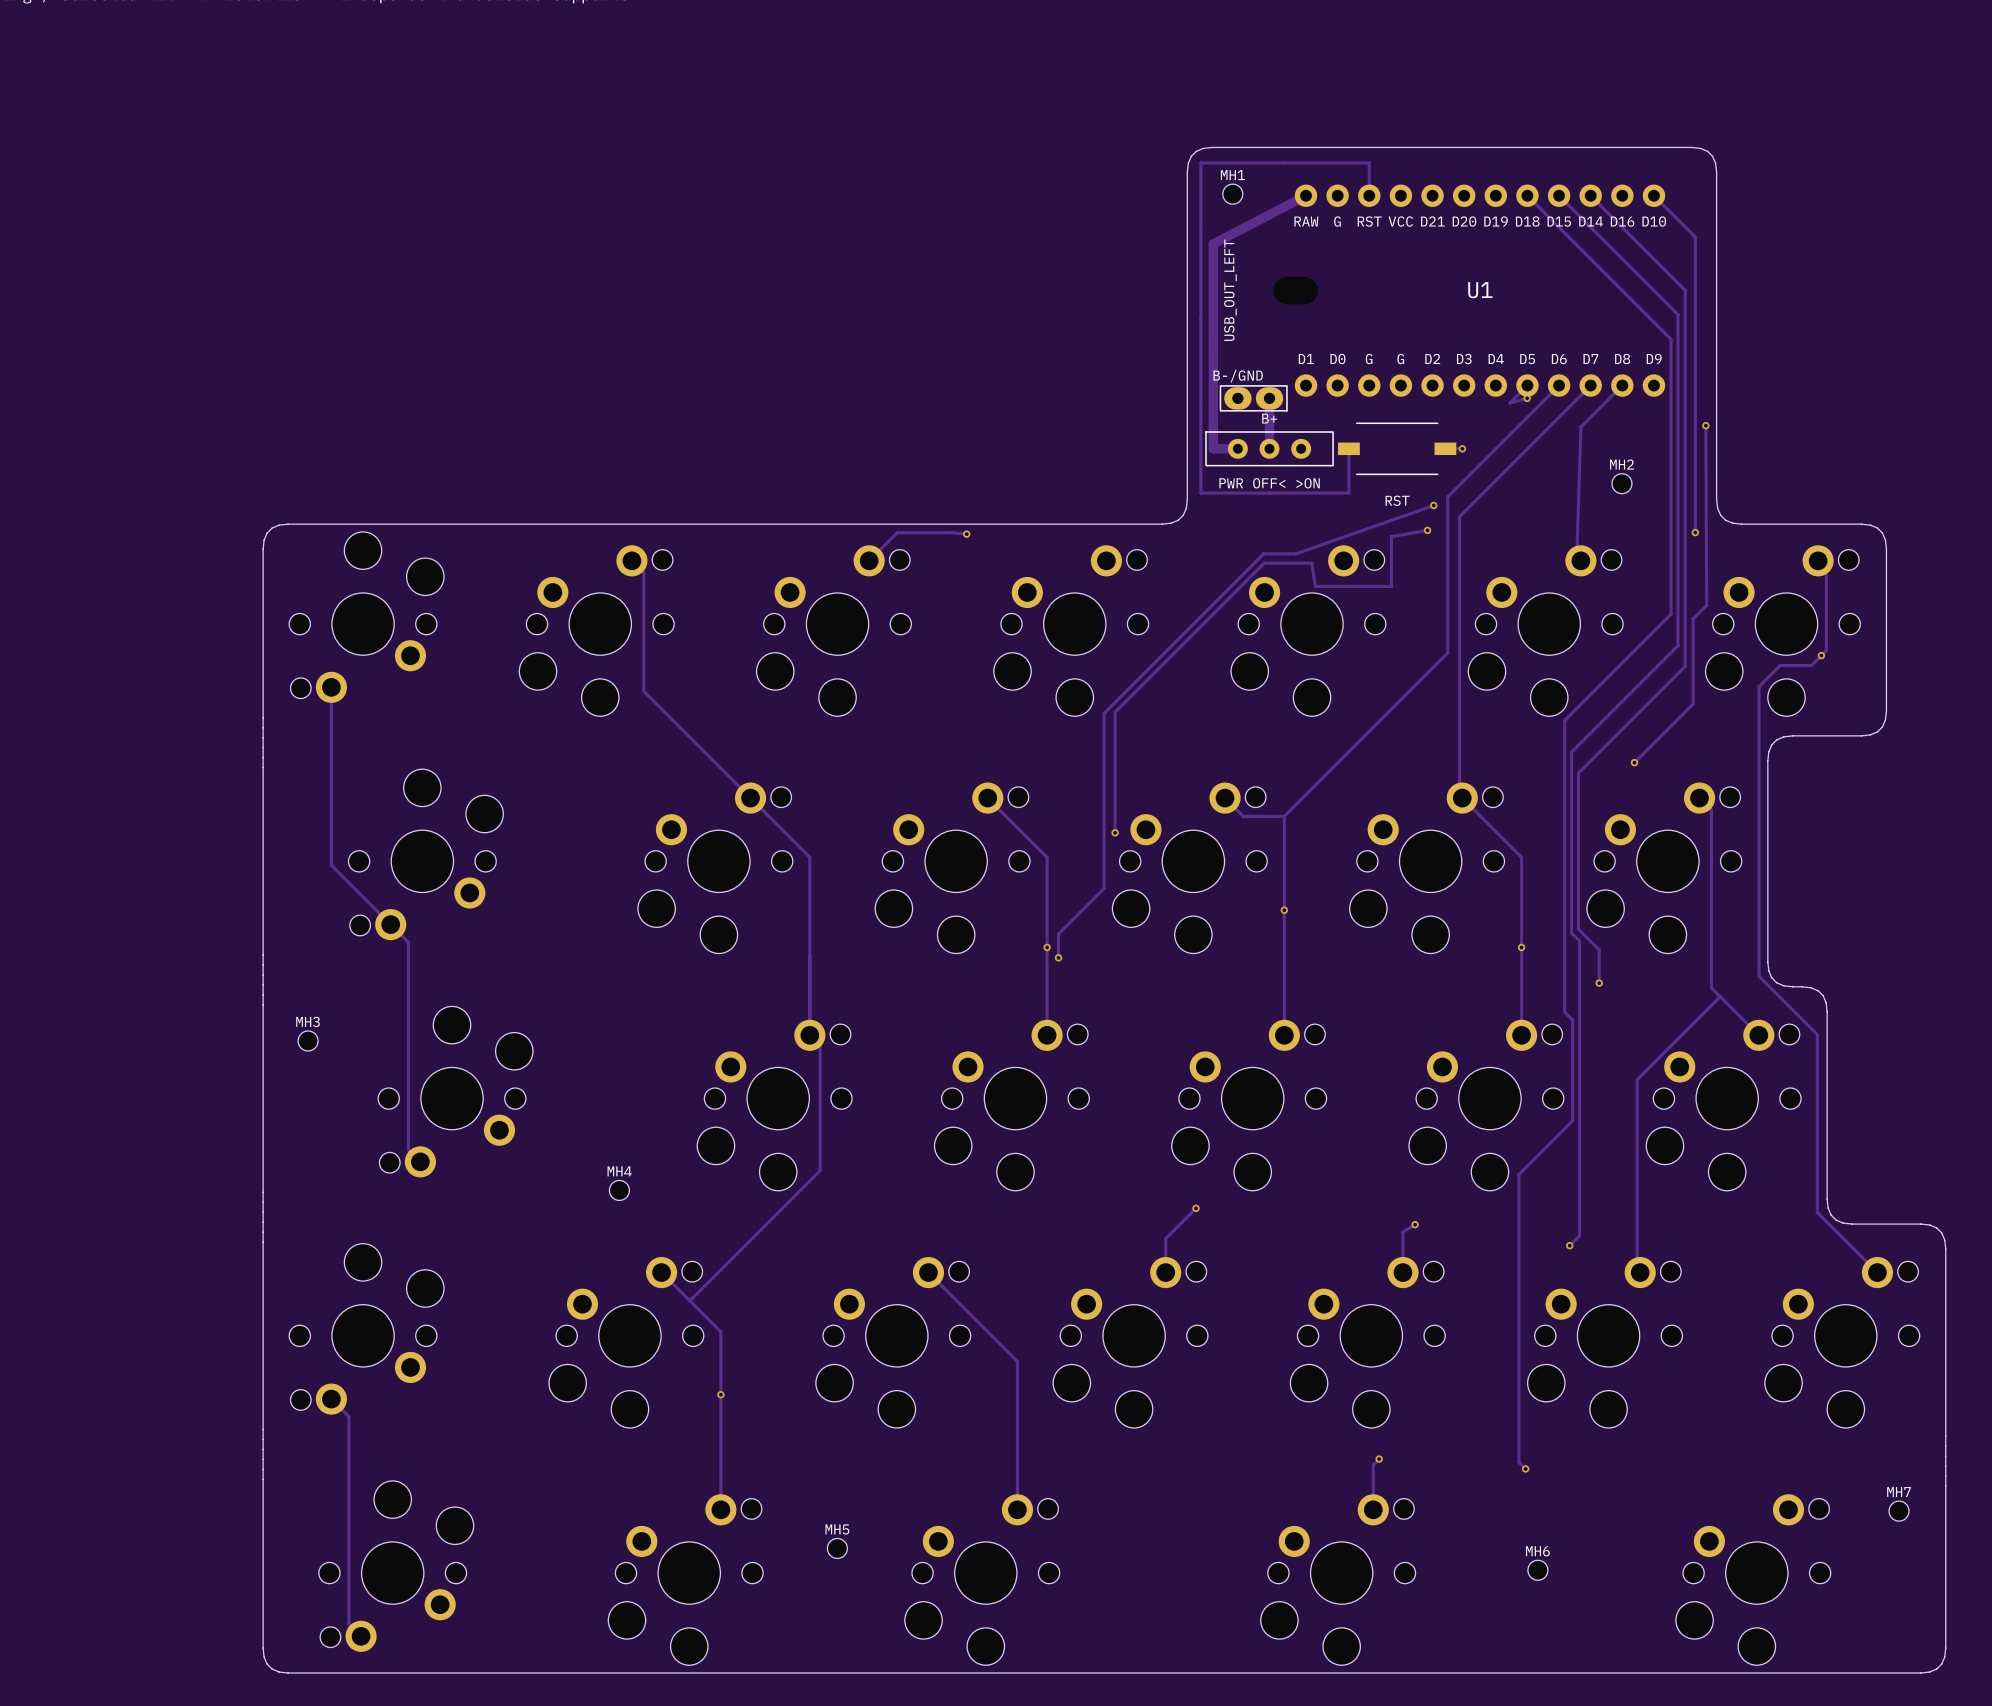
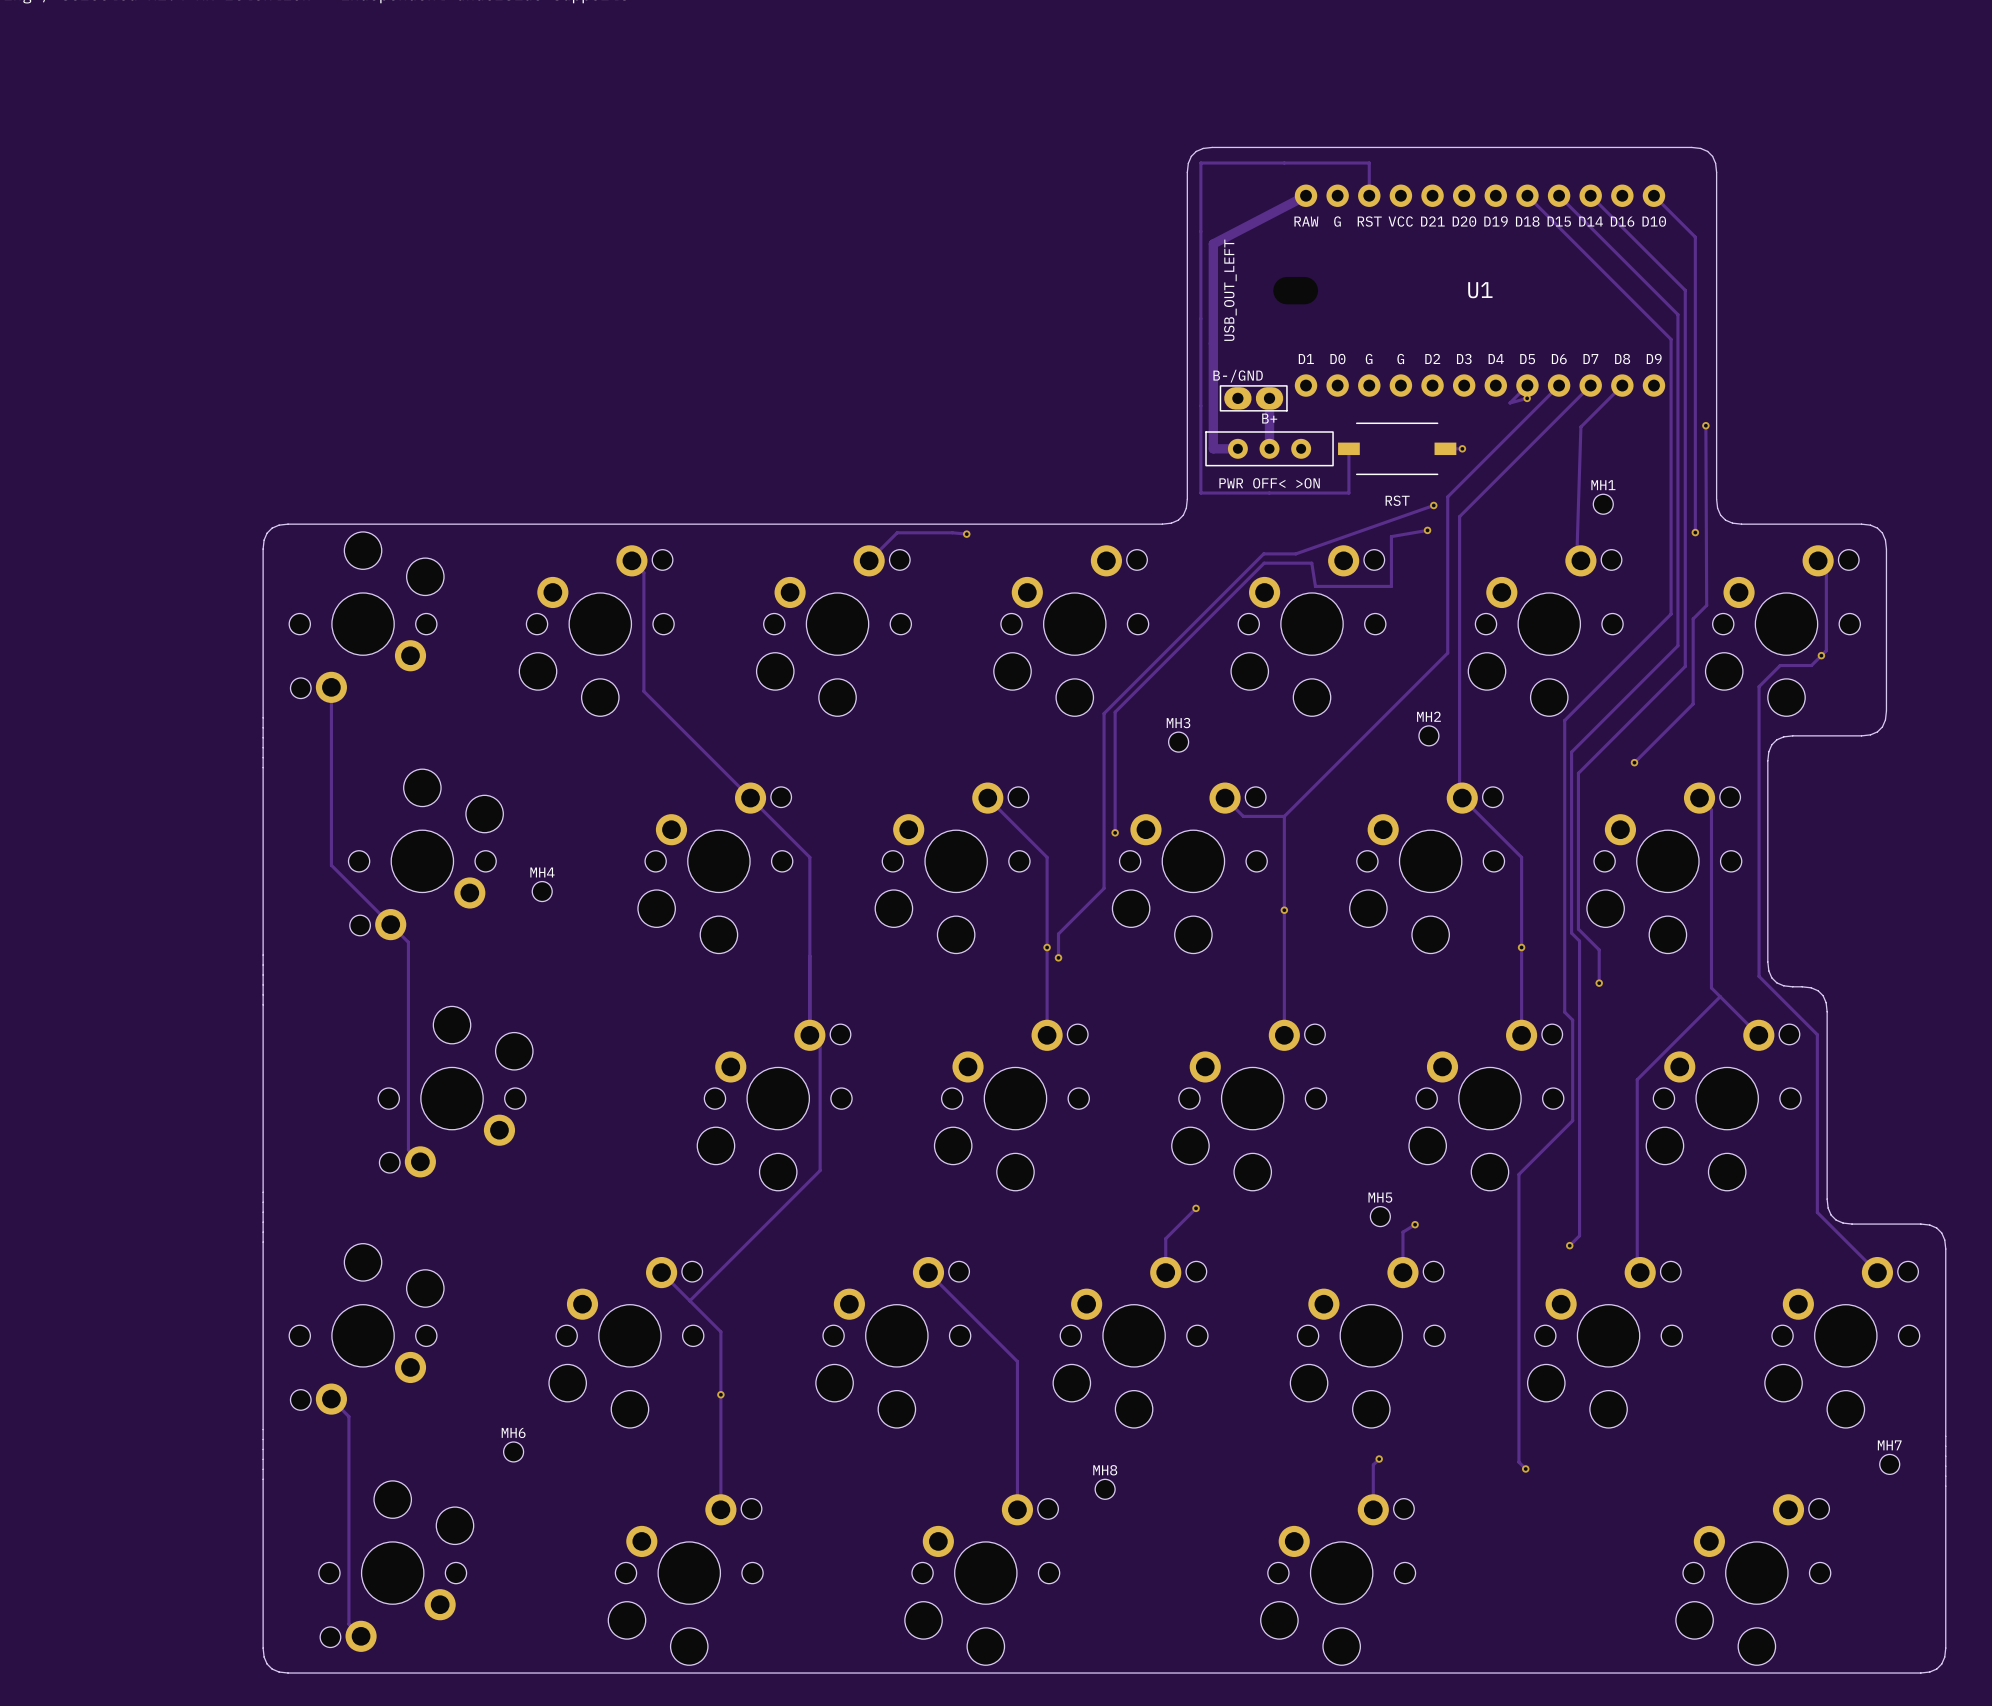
MH1 position: (1232, 194) -> (1603, 504)
MH2 position: (1621, 483) -> (1428, 735)
MH3 position: (308, 1040) -> (1178, 742)
MH4 position: (619, 1190) -> (542, 891)
MH8: none -> (1105, 1489)
MH7 position: (1899, 1511) -> (1889, 1464)
MH5 position: (837, 1548) -> (1380, 1216)
MH6 position: (1537, 1570) -> (513, 1451)

